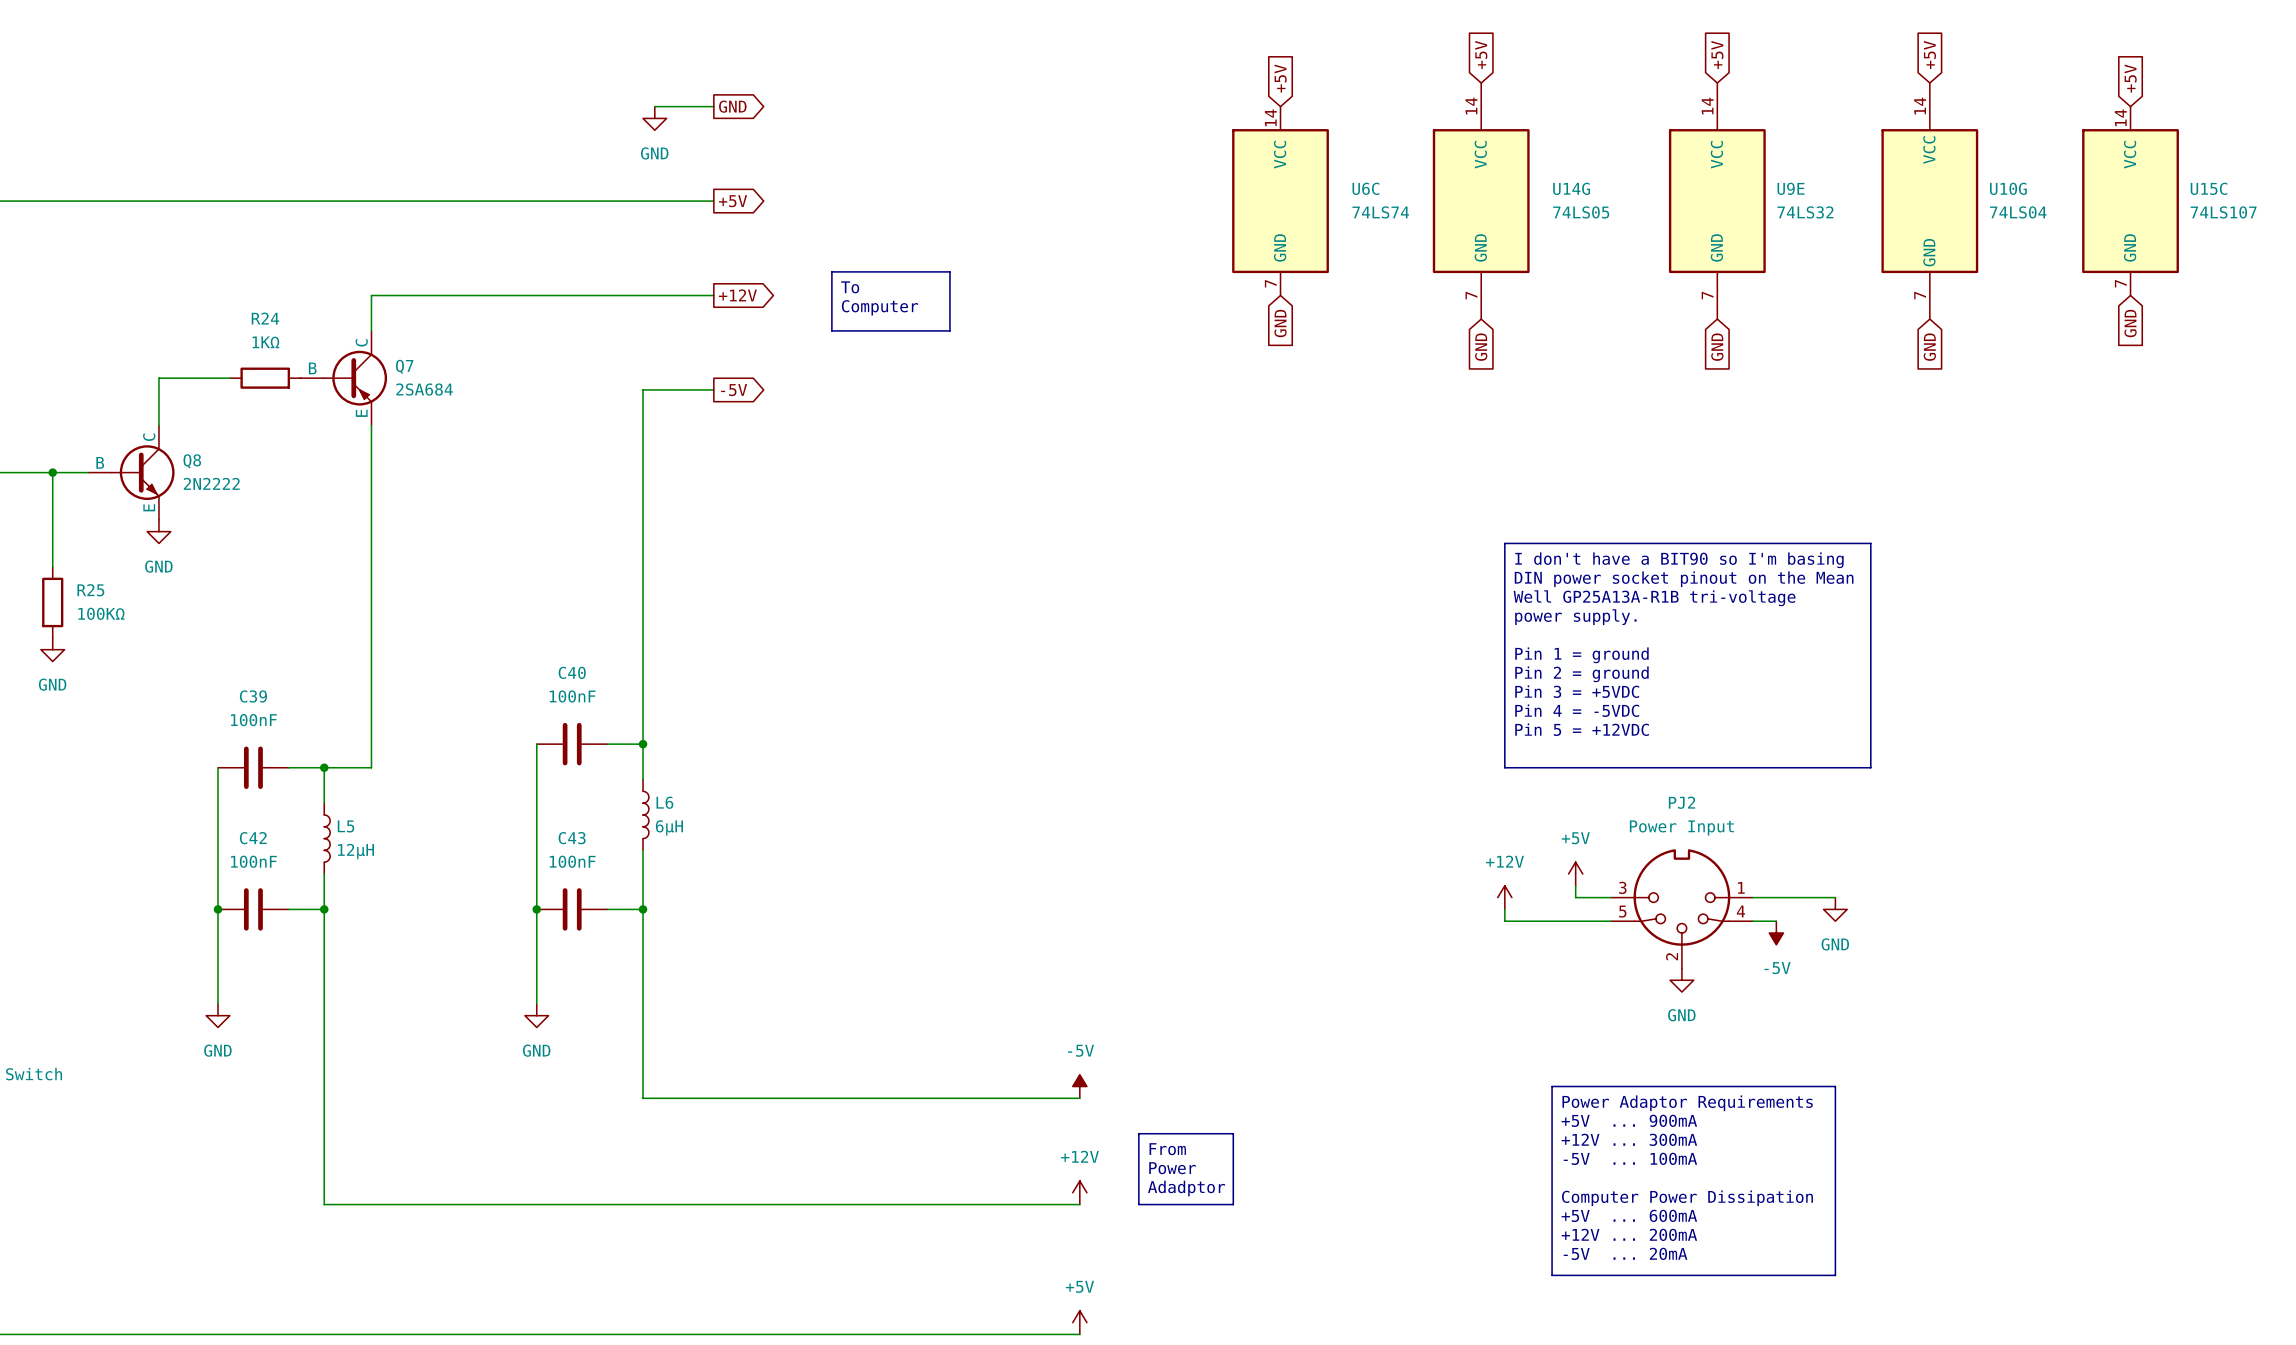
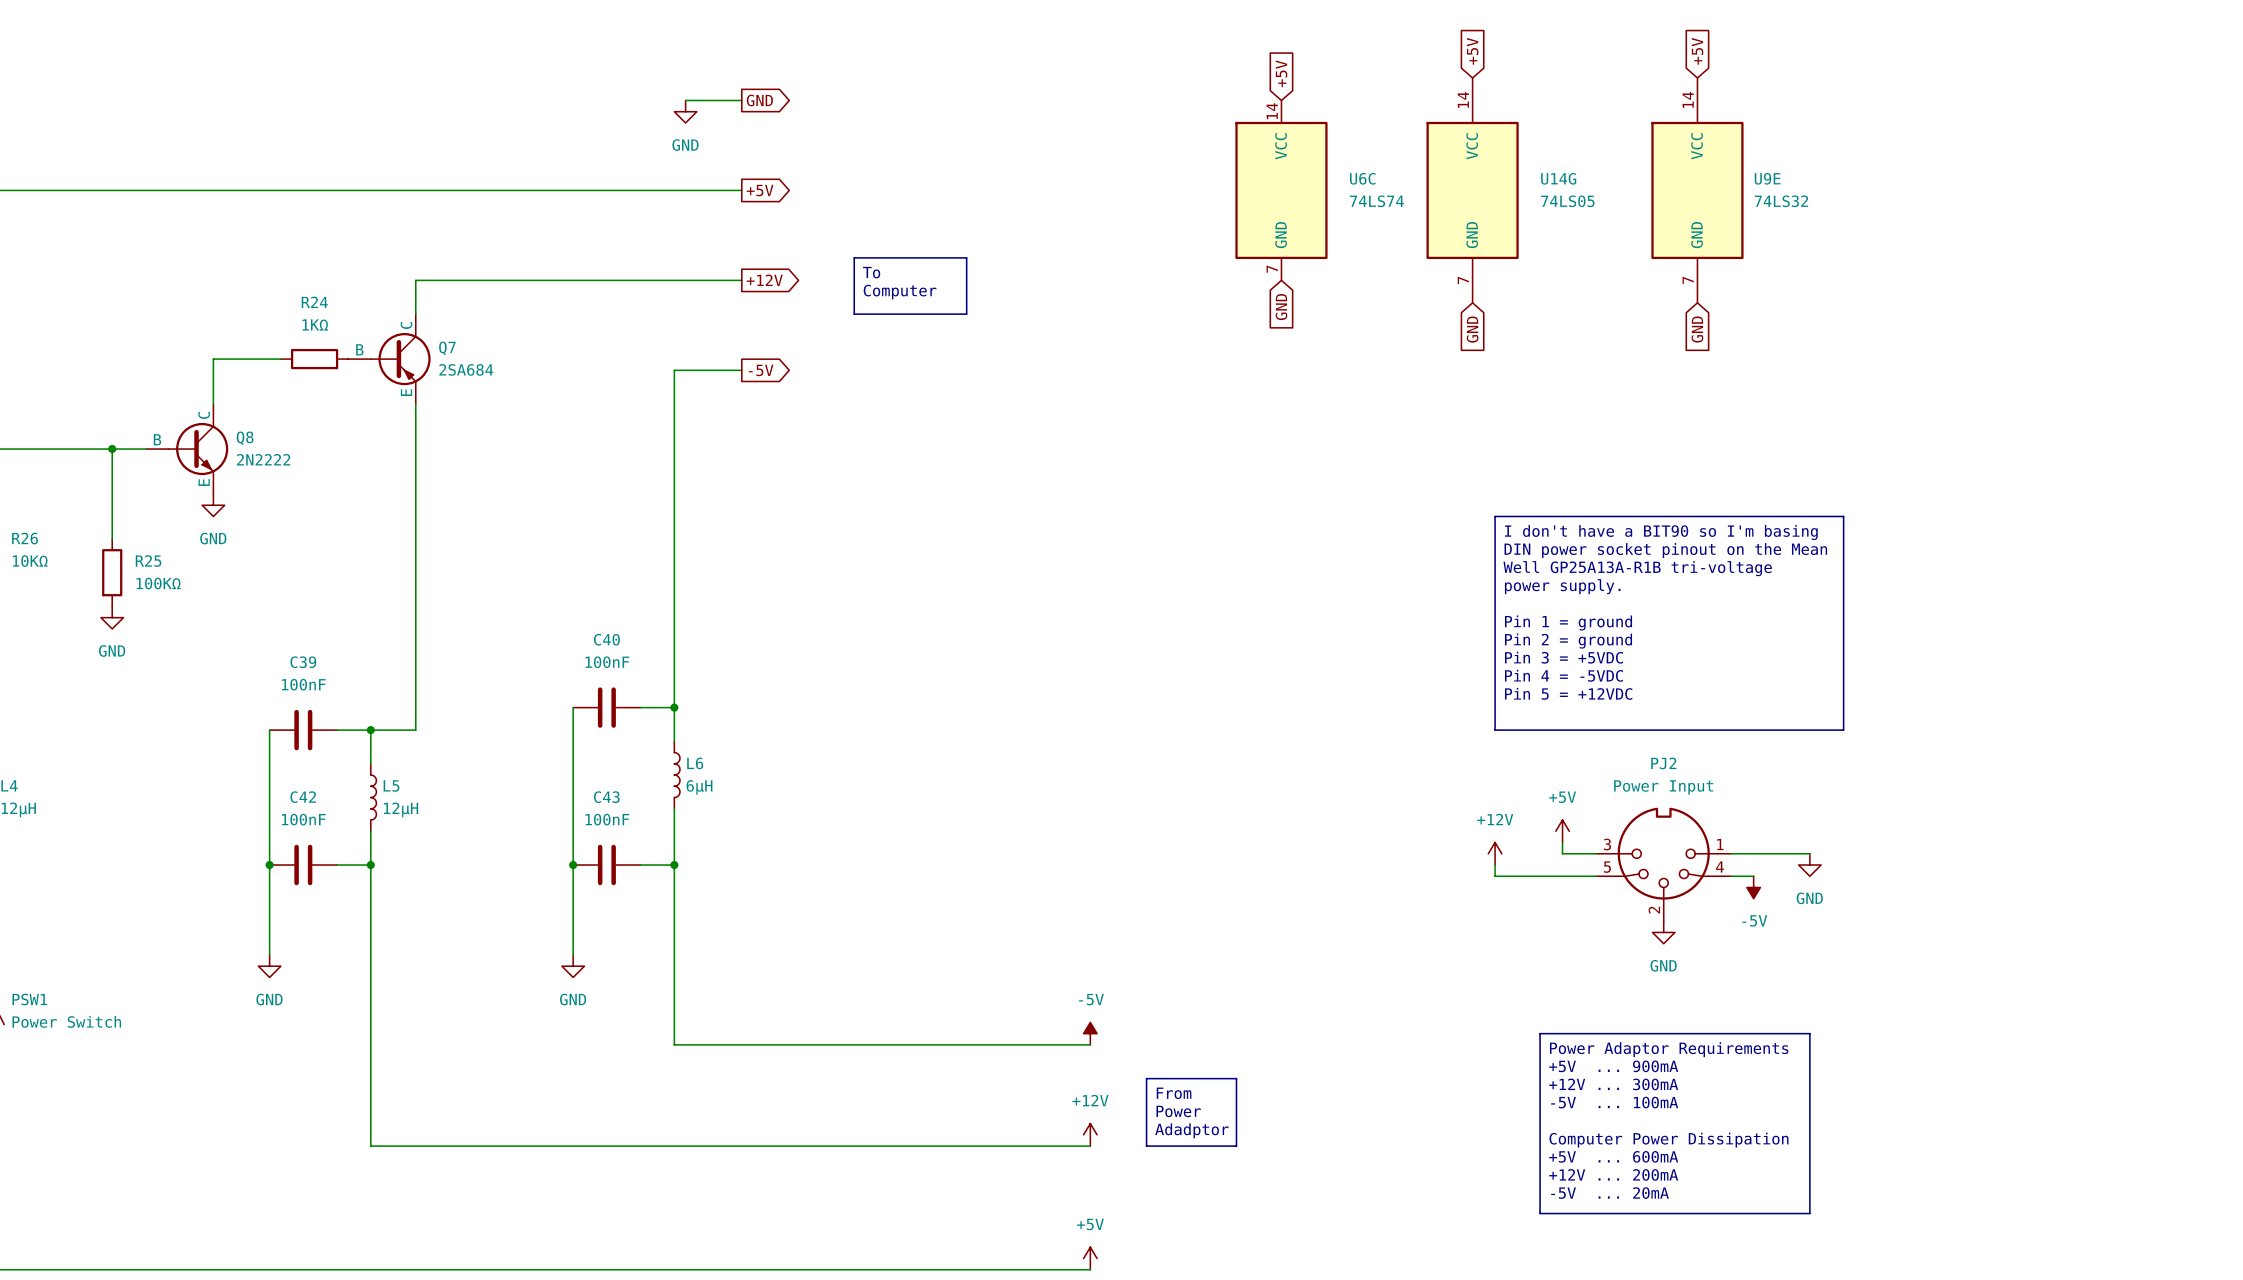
global label: +5V (1929, 54) -> none
global label: +5V (2130, 78) -> none
U10G: 74LS04 (1929, 201) -> none
U15C: 74LS107 (2130, 201) -> none
global label: GND (2130, 323) -> none
global label: GND (1929, 347) -> none

